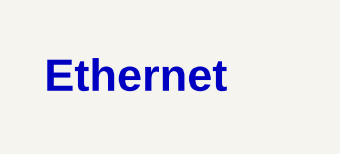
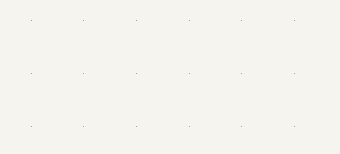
text: Ethernet (137, 74) -> none

